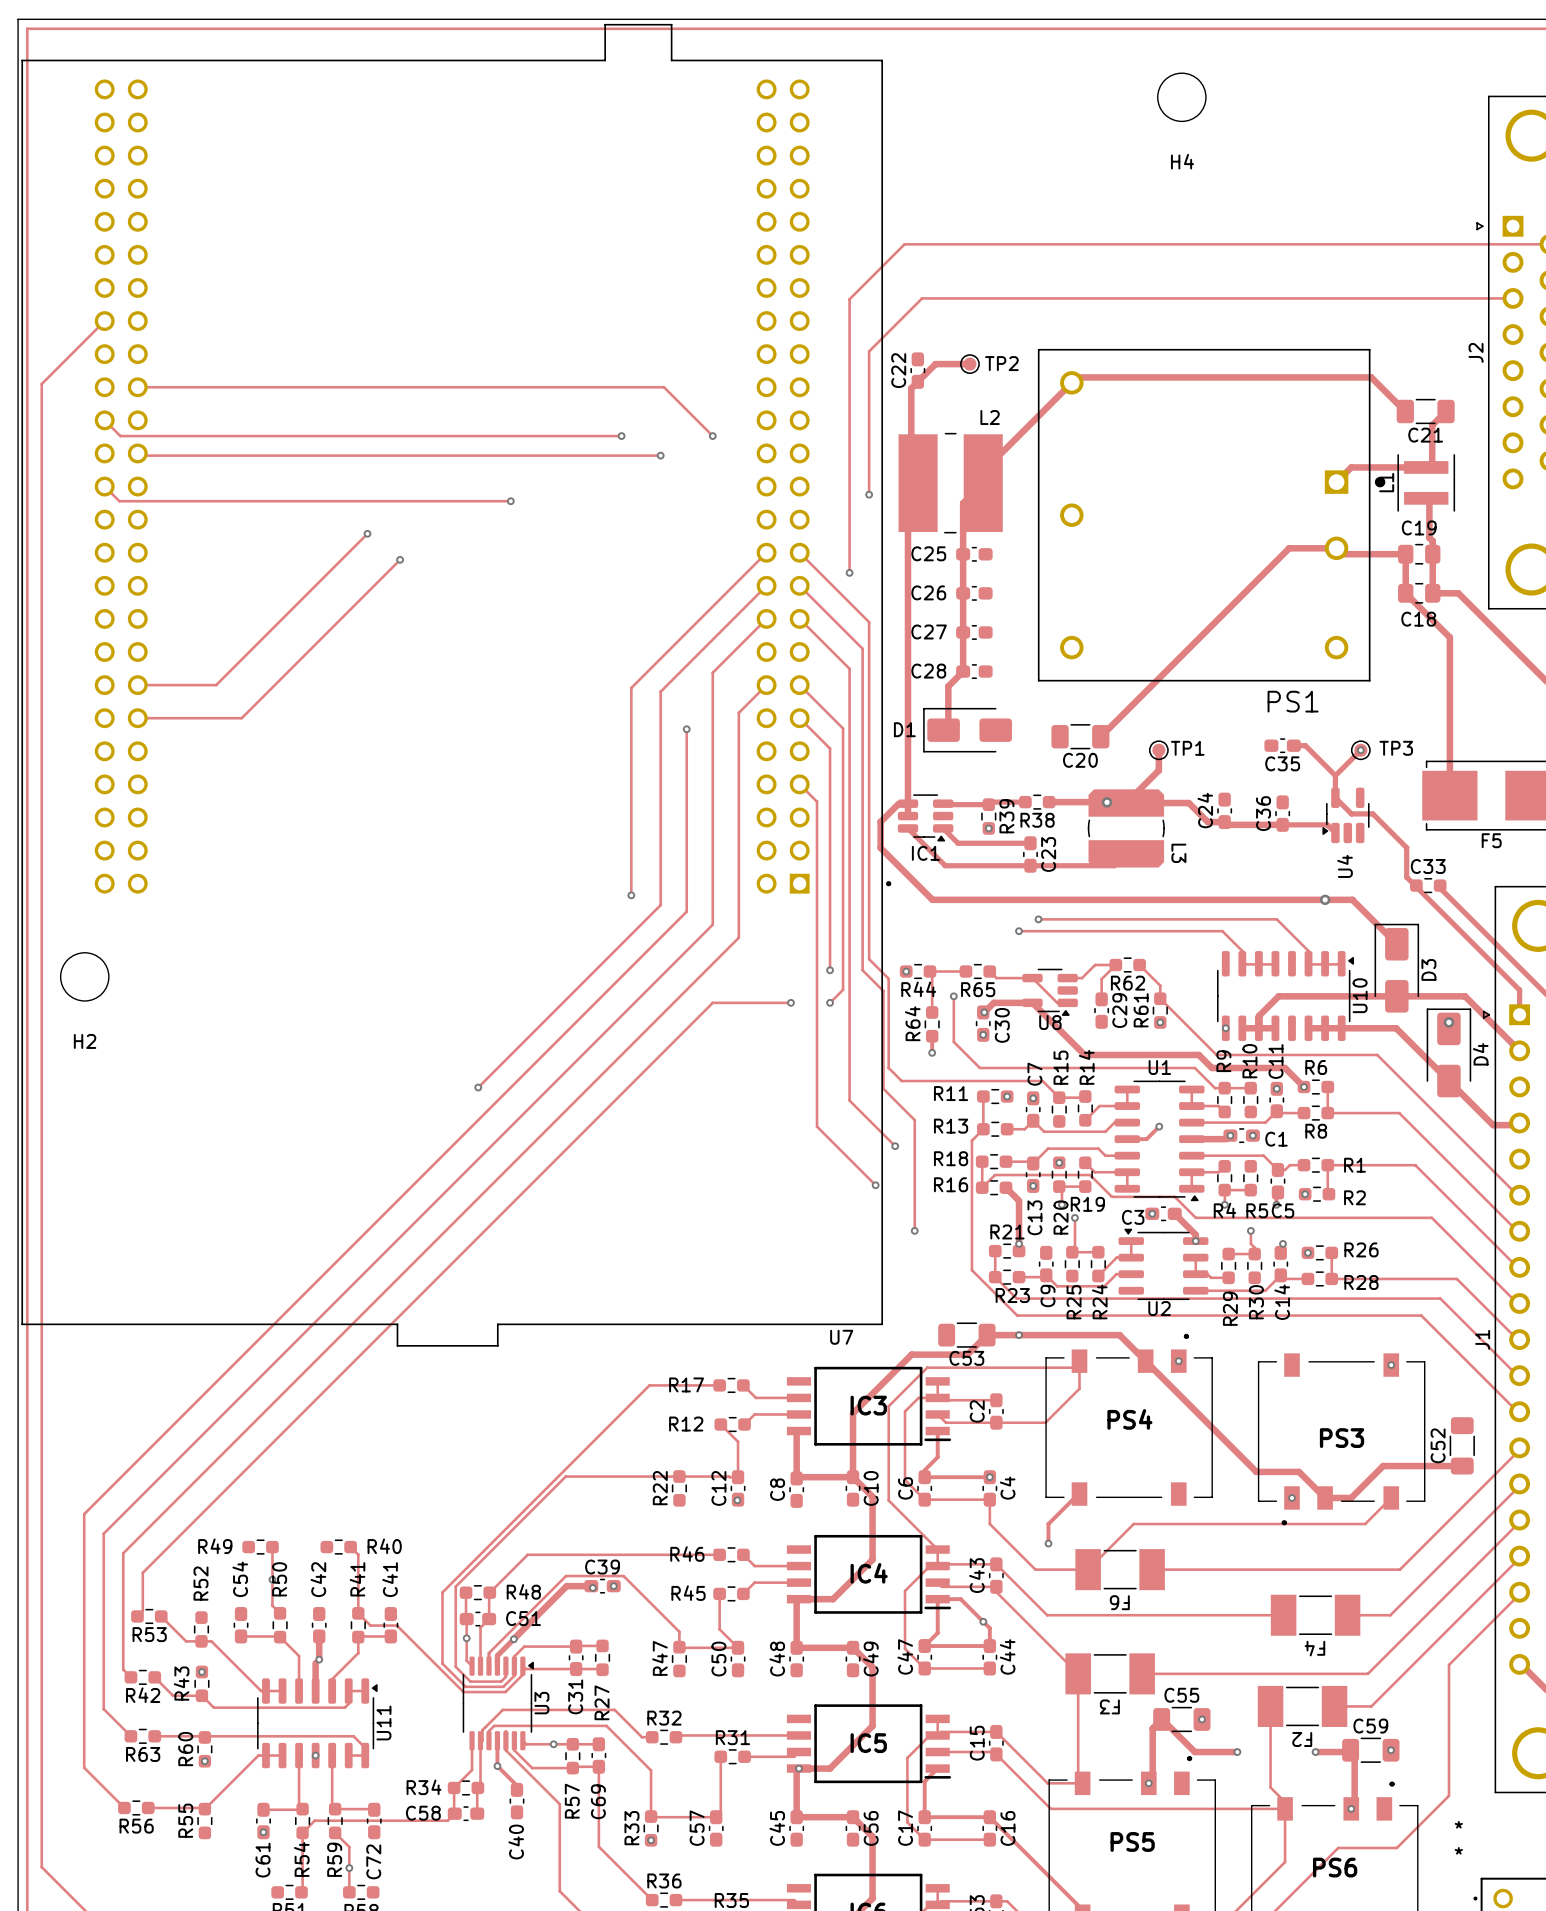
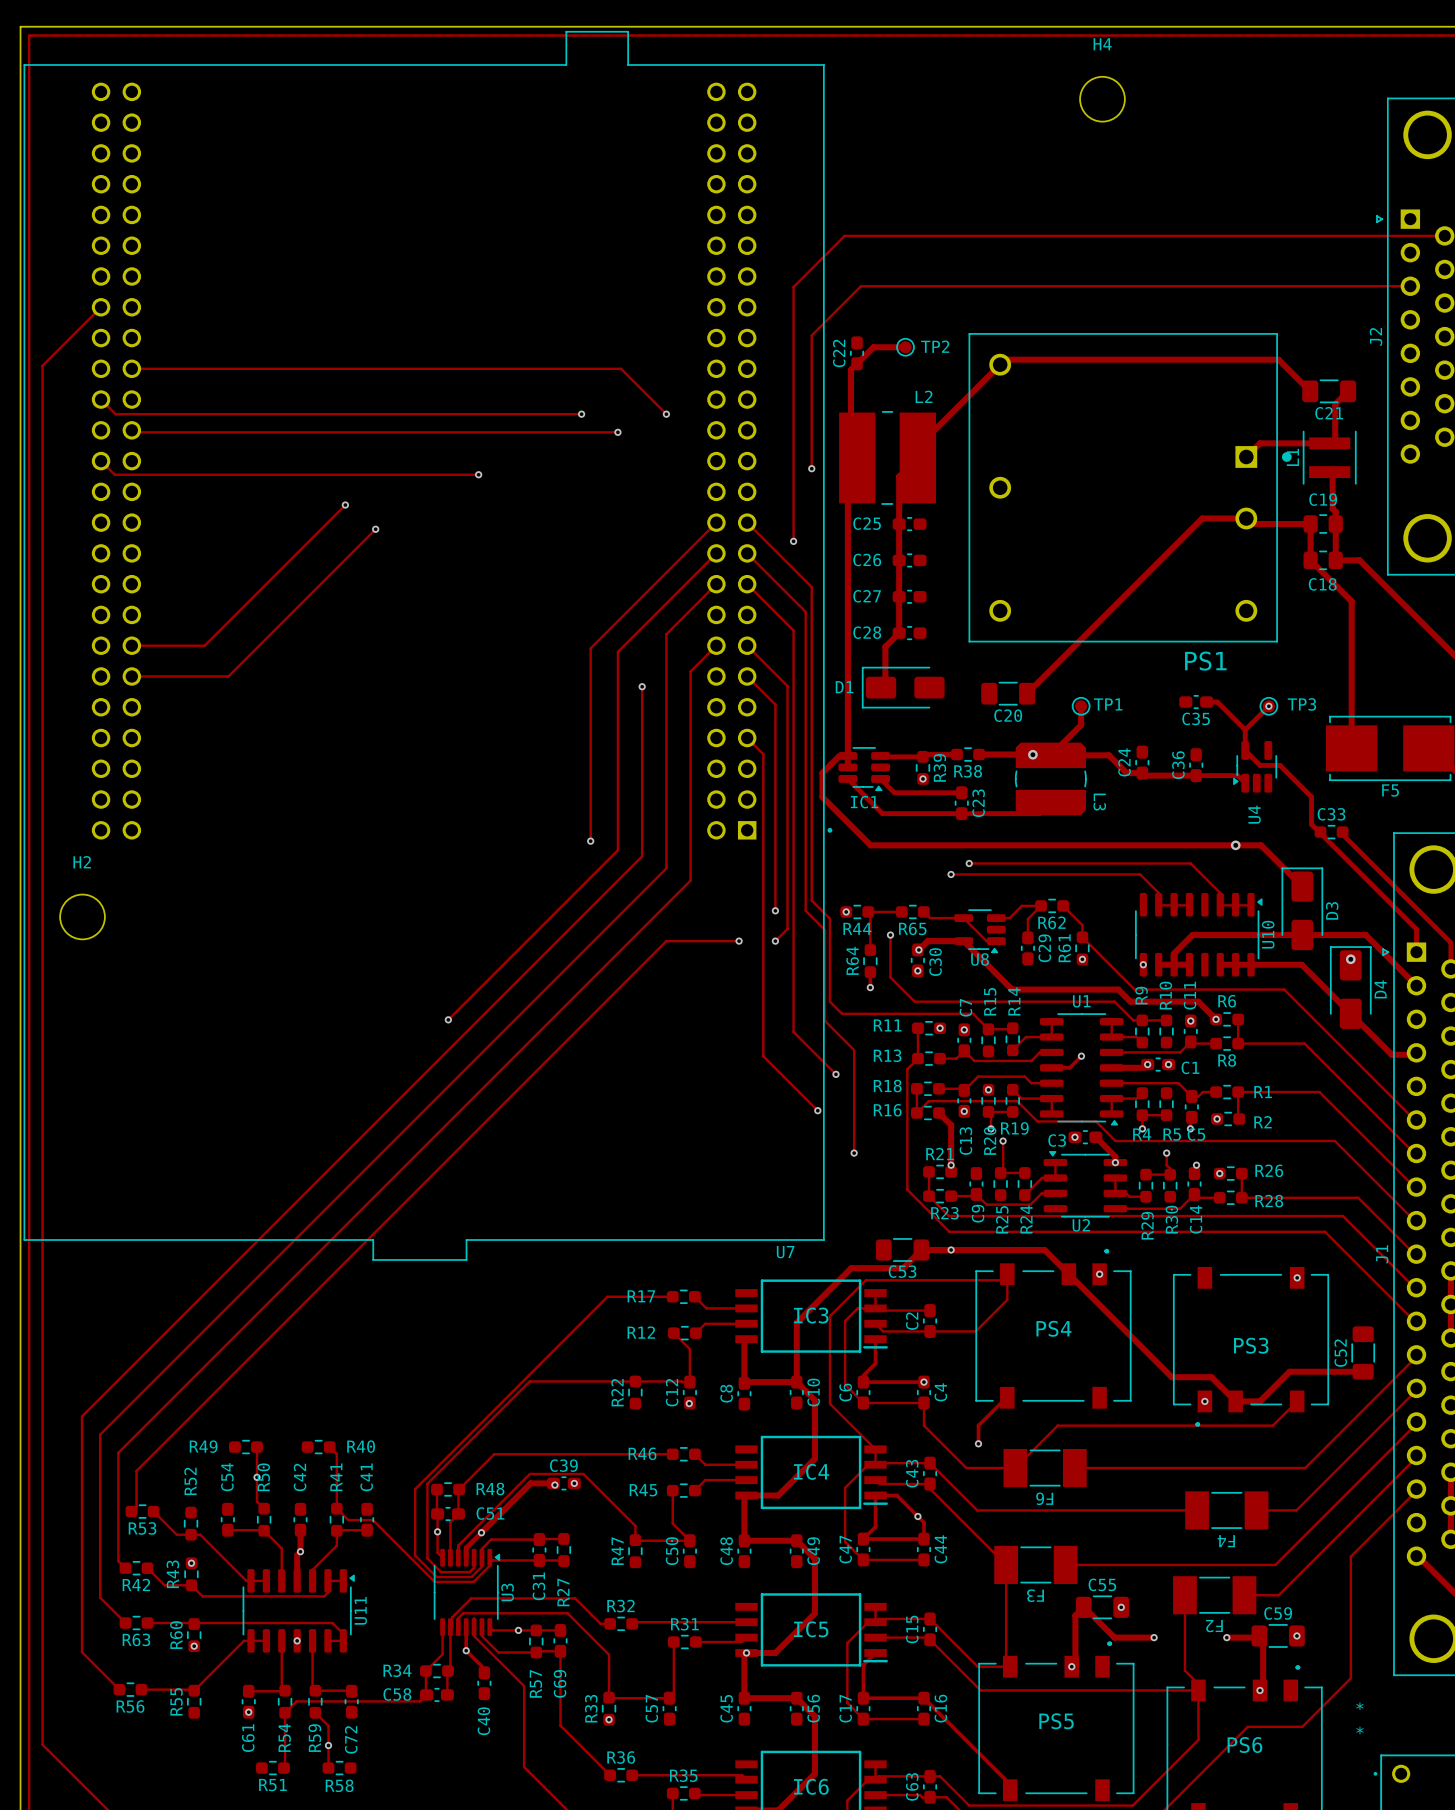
H4 name position: H4 (1182, 161) -> H4 (1102, 44)
H2 name position: H2 (85, 1041) -> H2 (82, 862)

